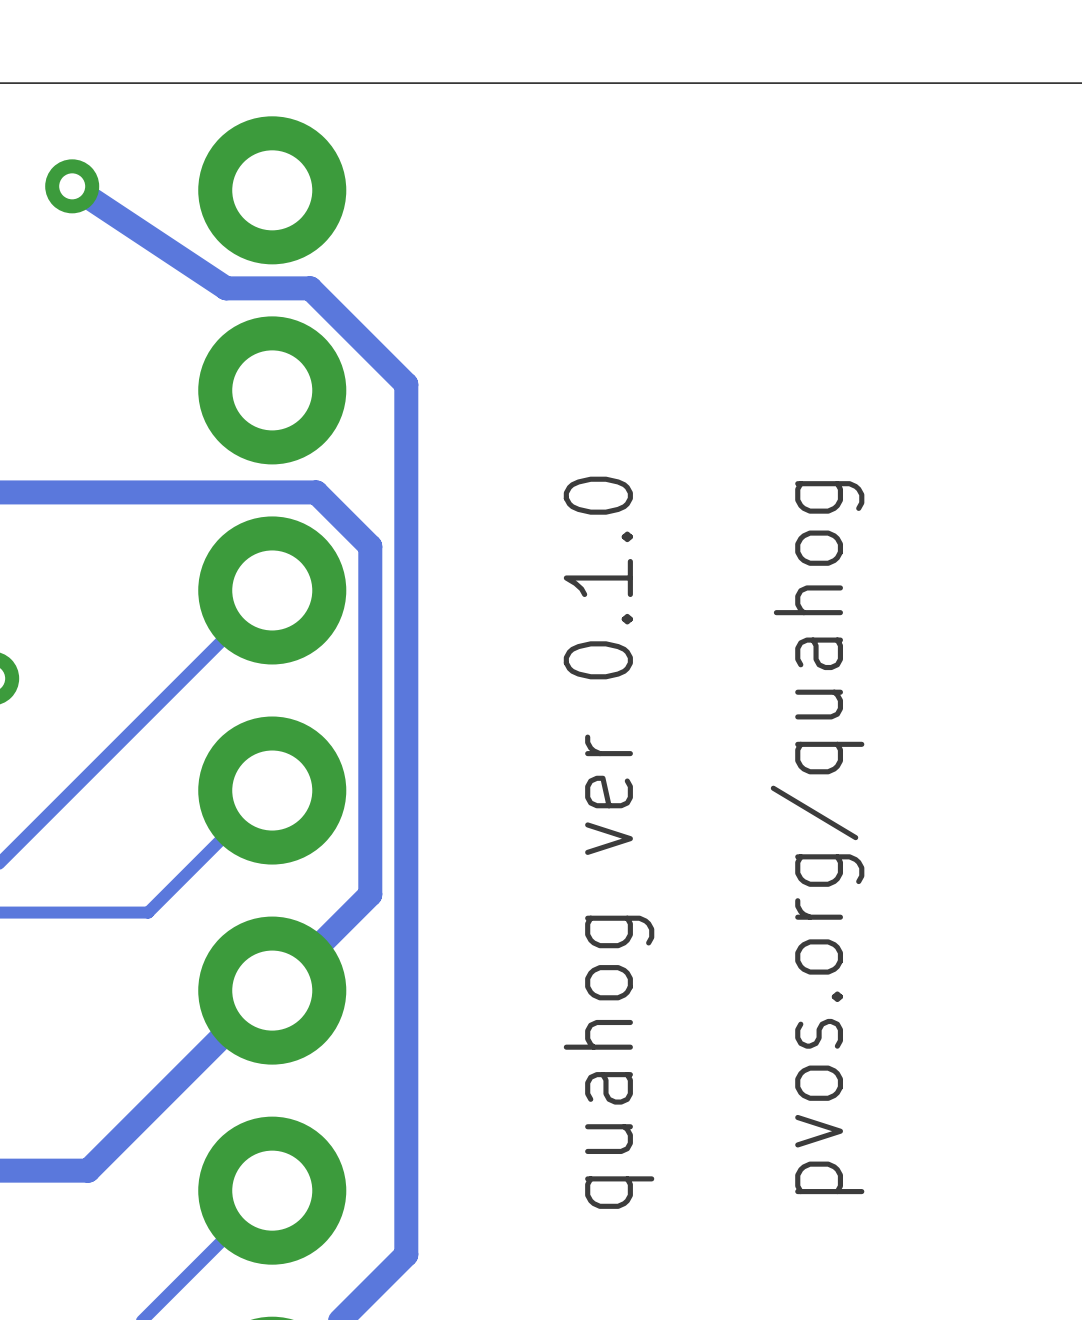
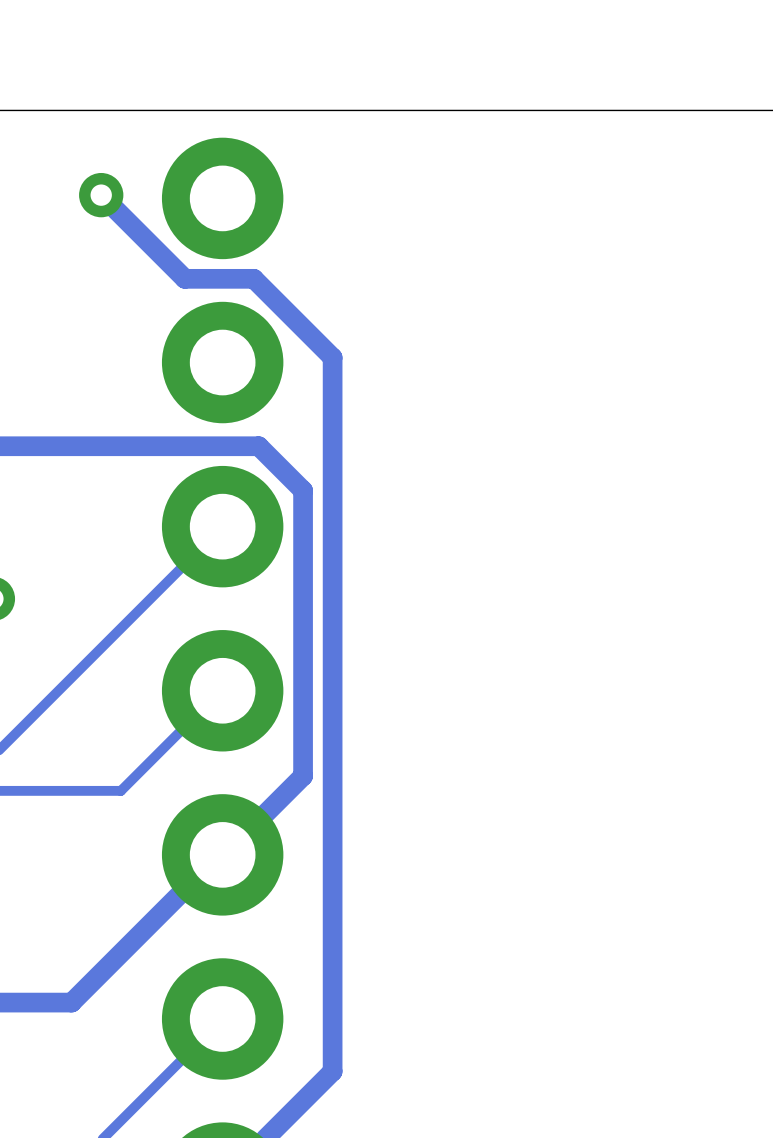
track: (72, 186) (226, 288) -> (101, 195) (184, 278)
via position: (72, 186) -> (101, 195)
text: pvos.org/quahog (817, 837) -> none
text: quahog ver 0.1.0 (609, 842) -> none

